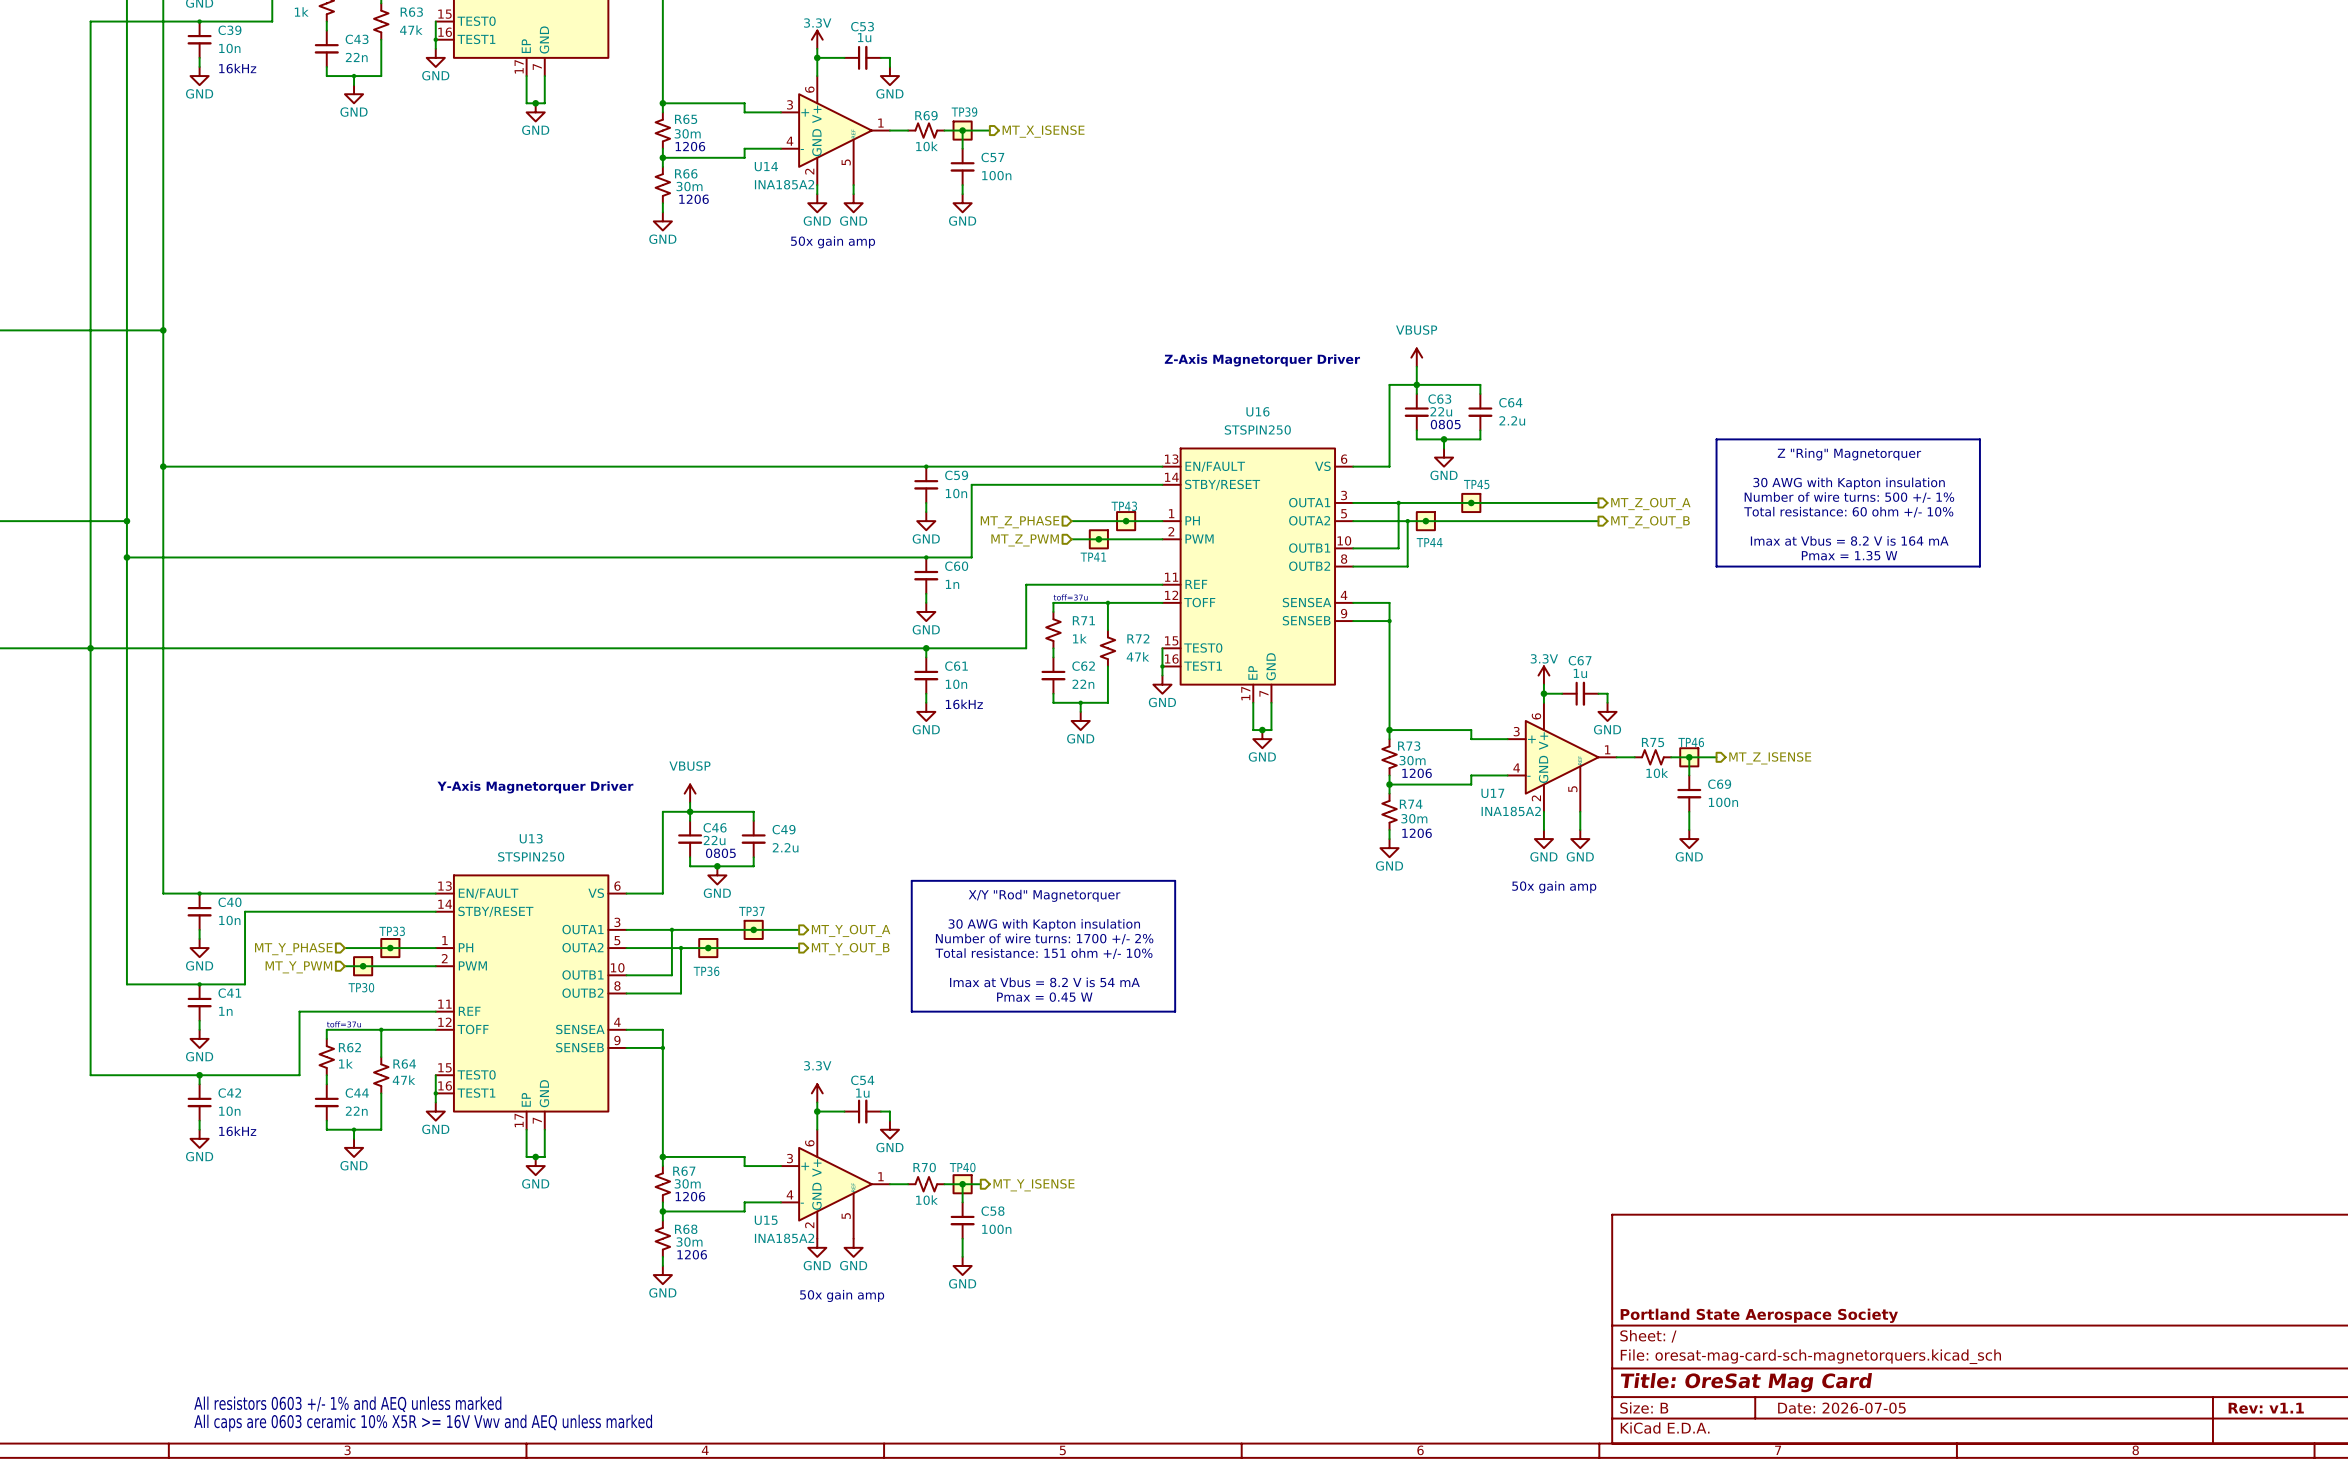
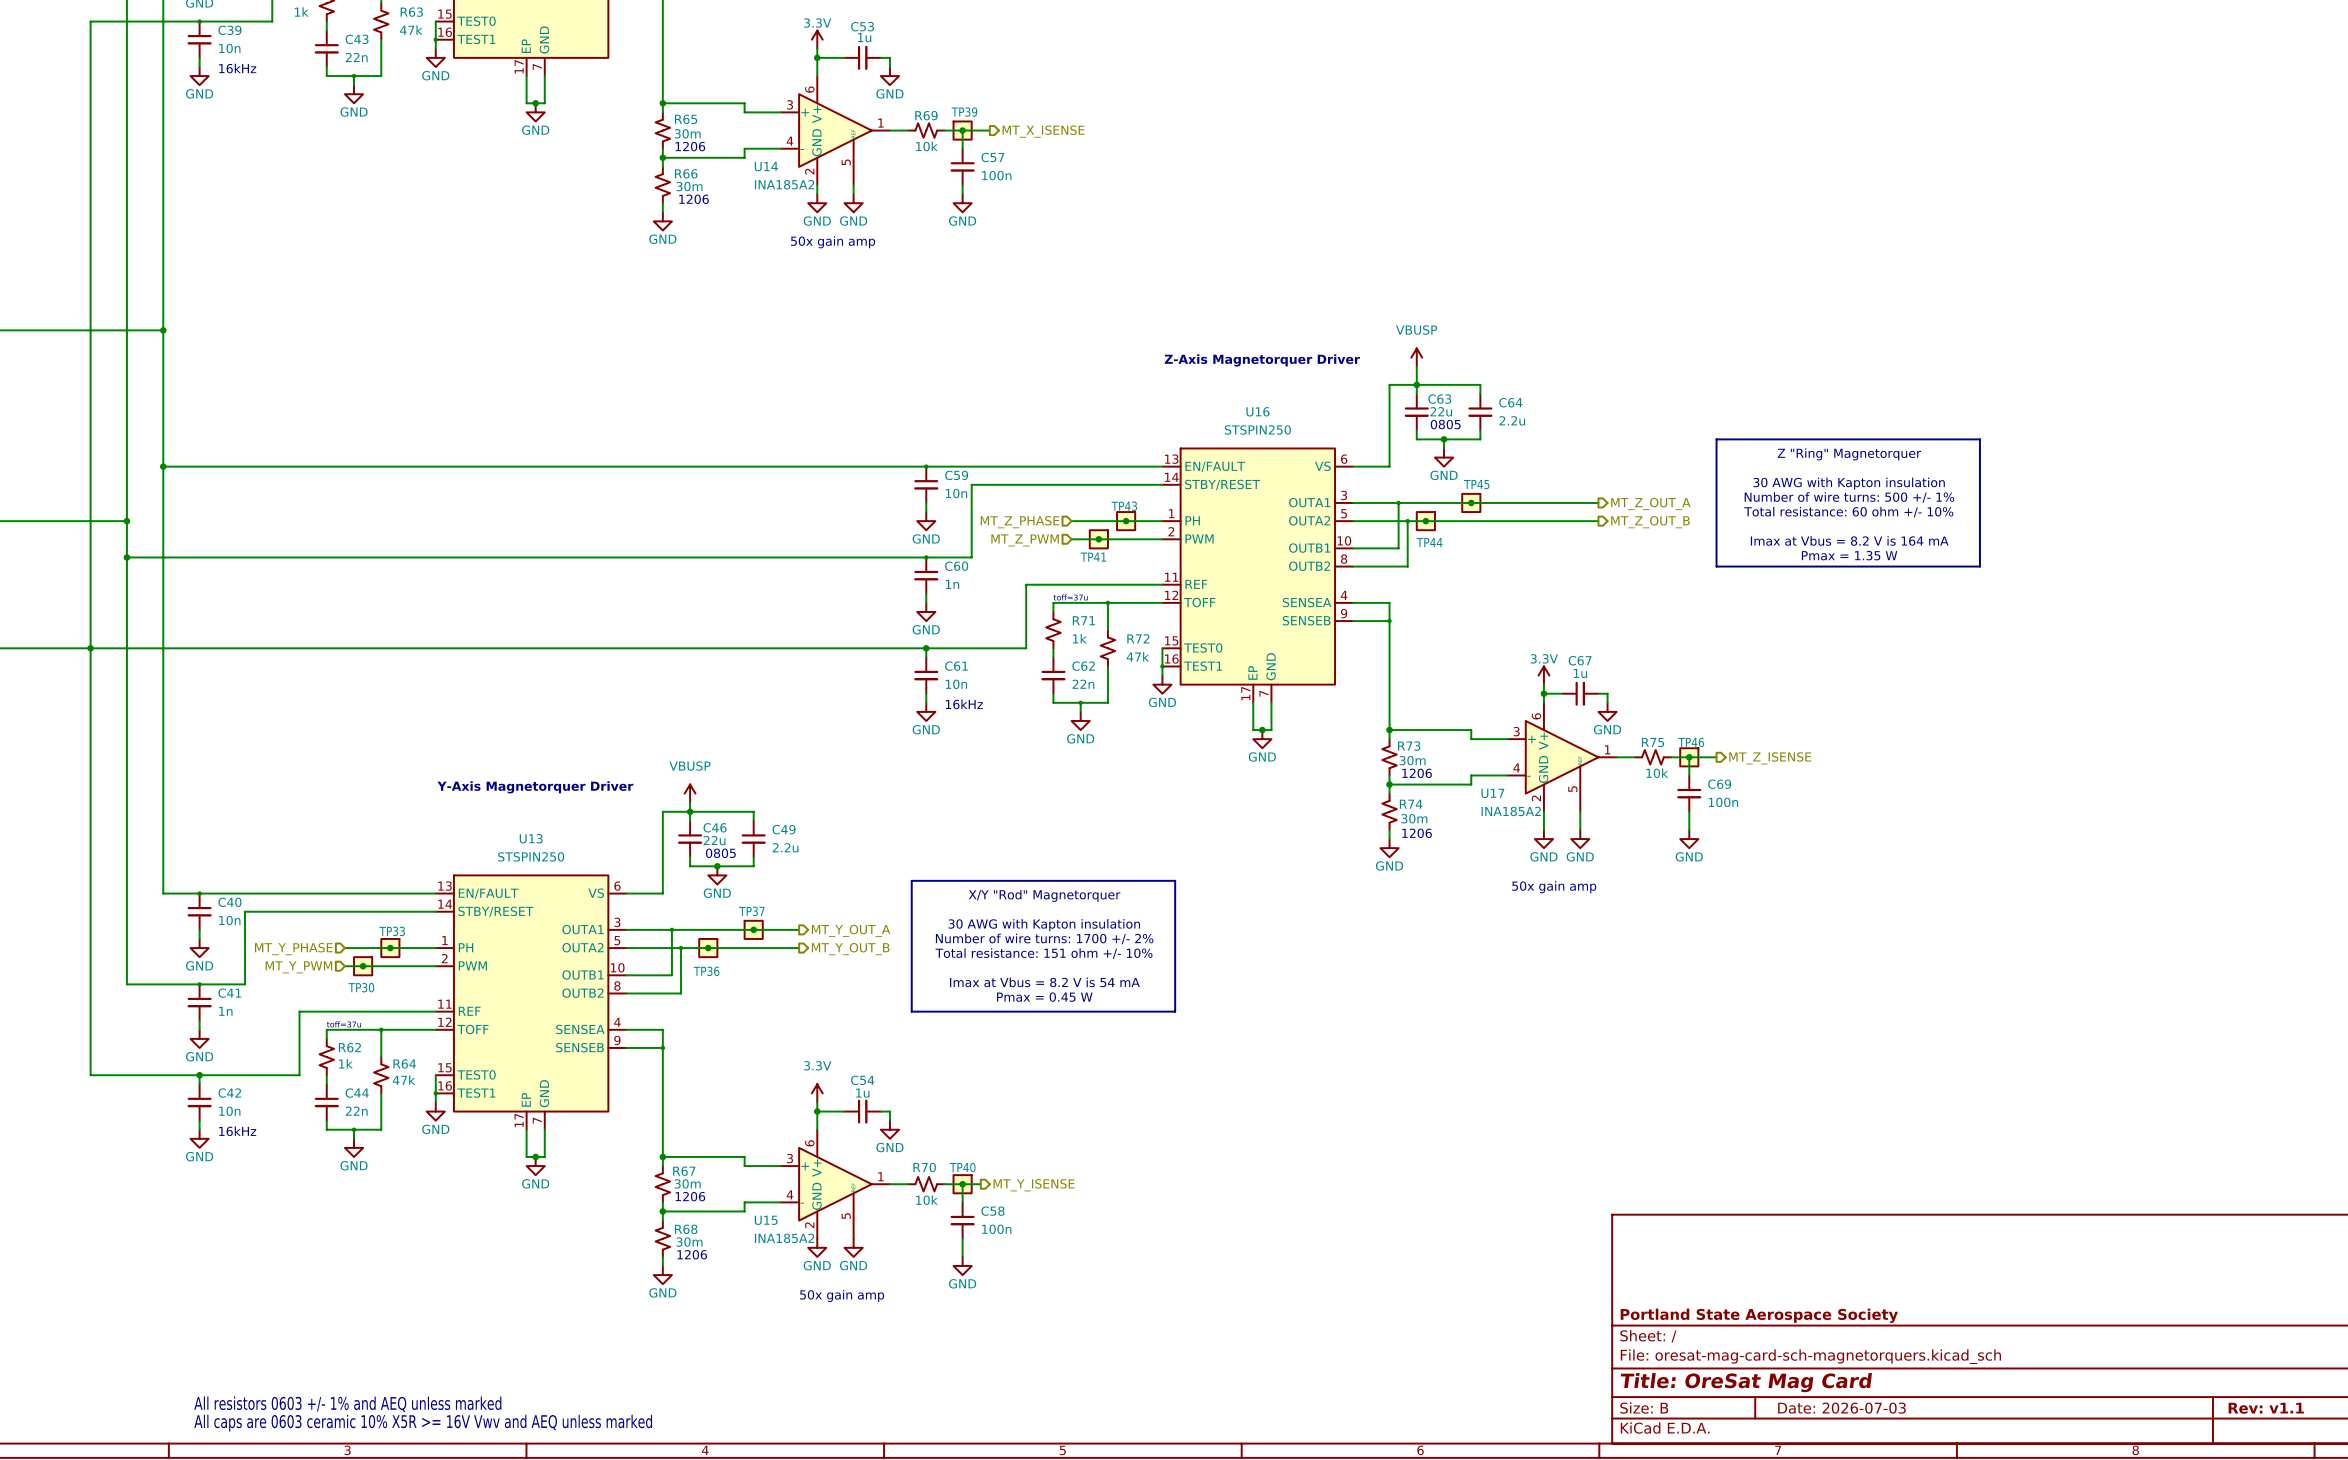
title block: Date: 2026-07-05 (1841, 1408) -> Date: 2026-07-03 (1841, 1408)

